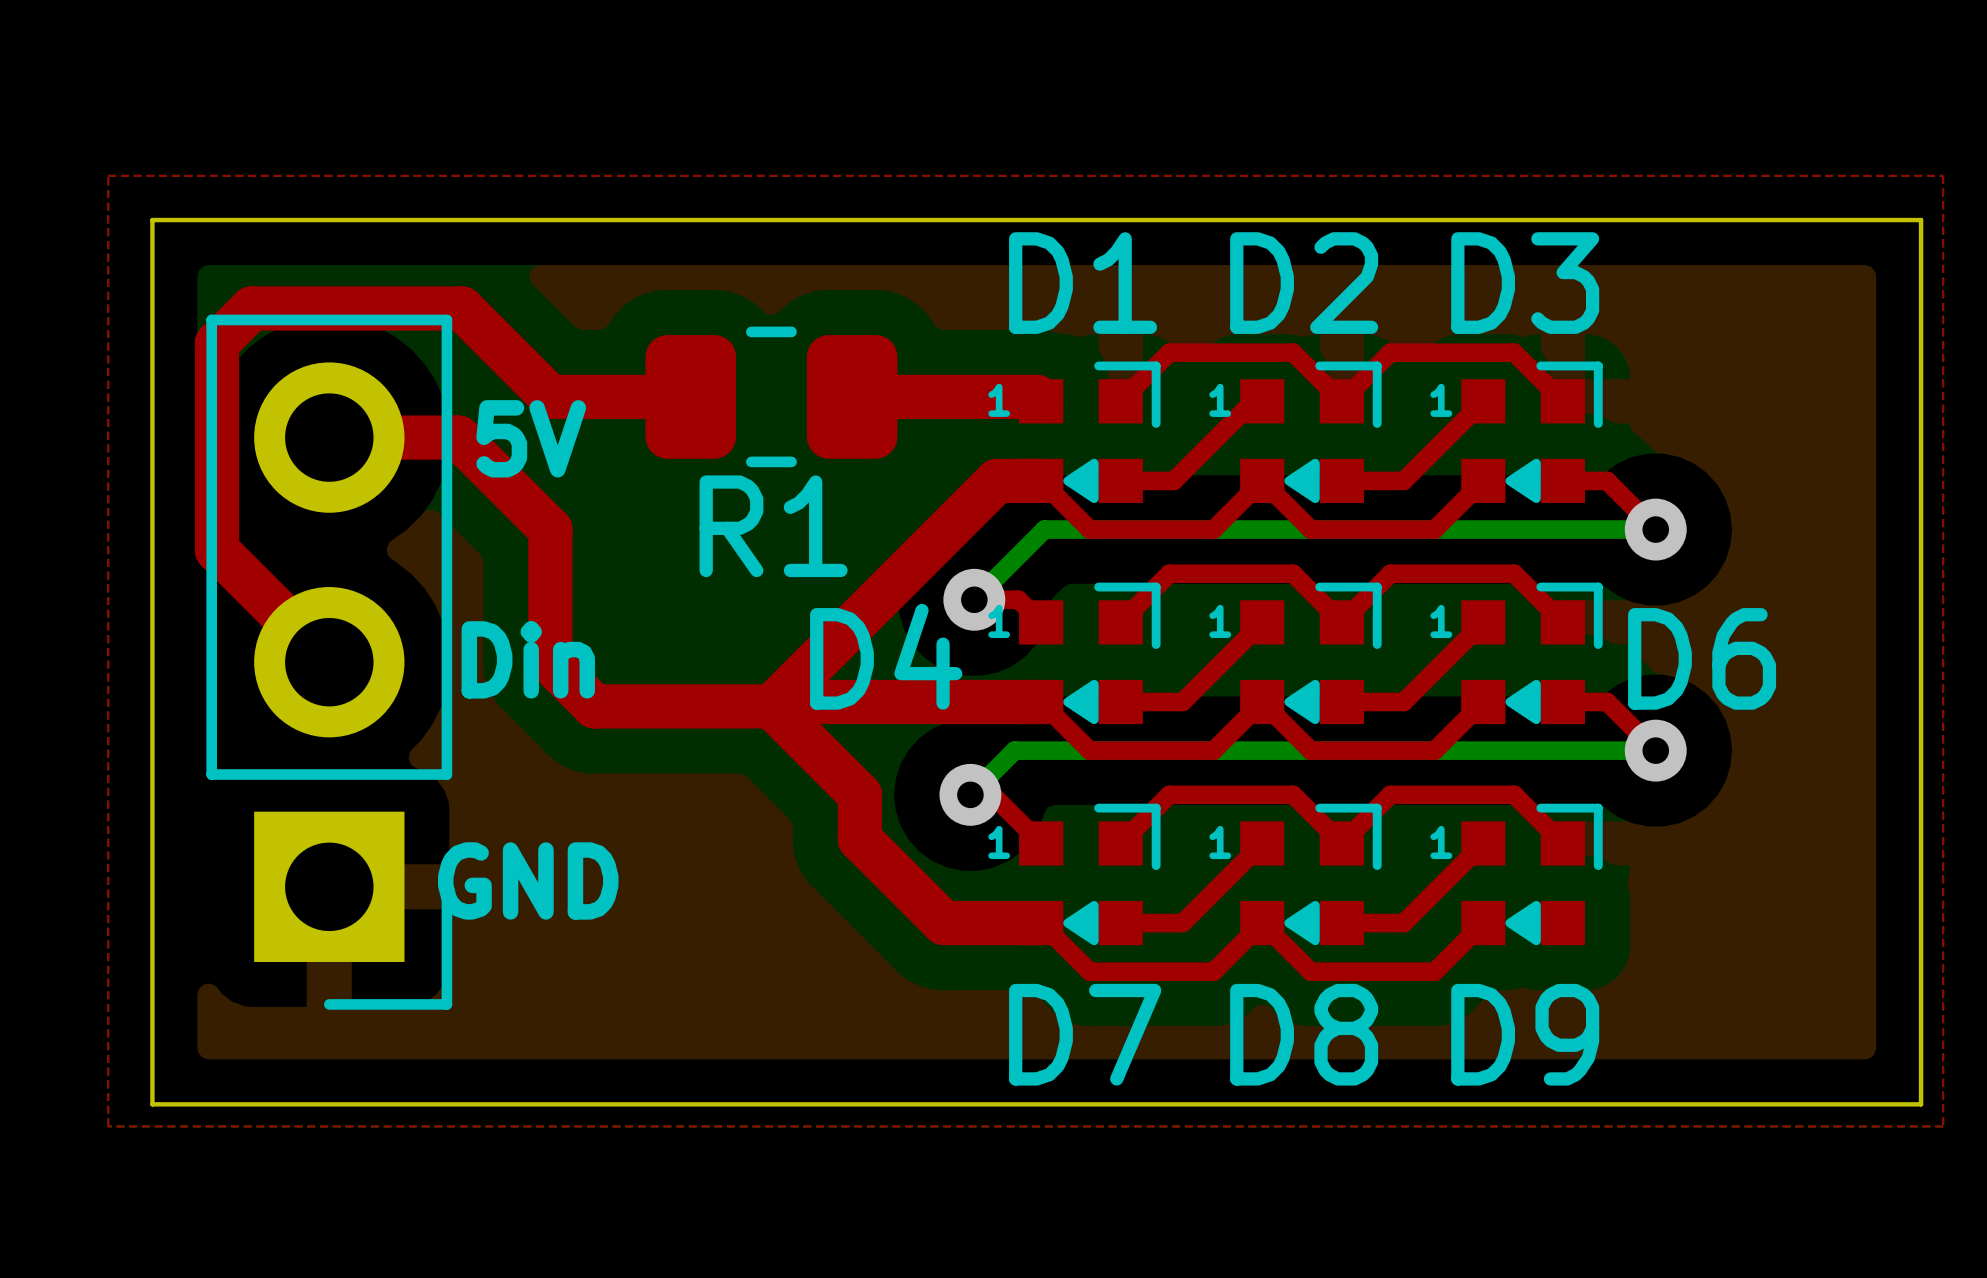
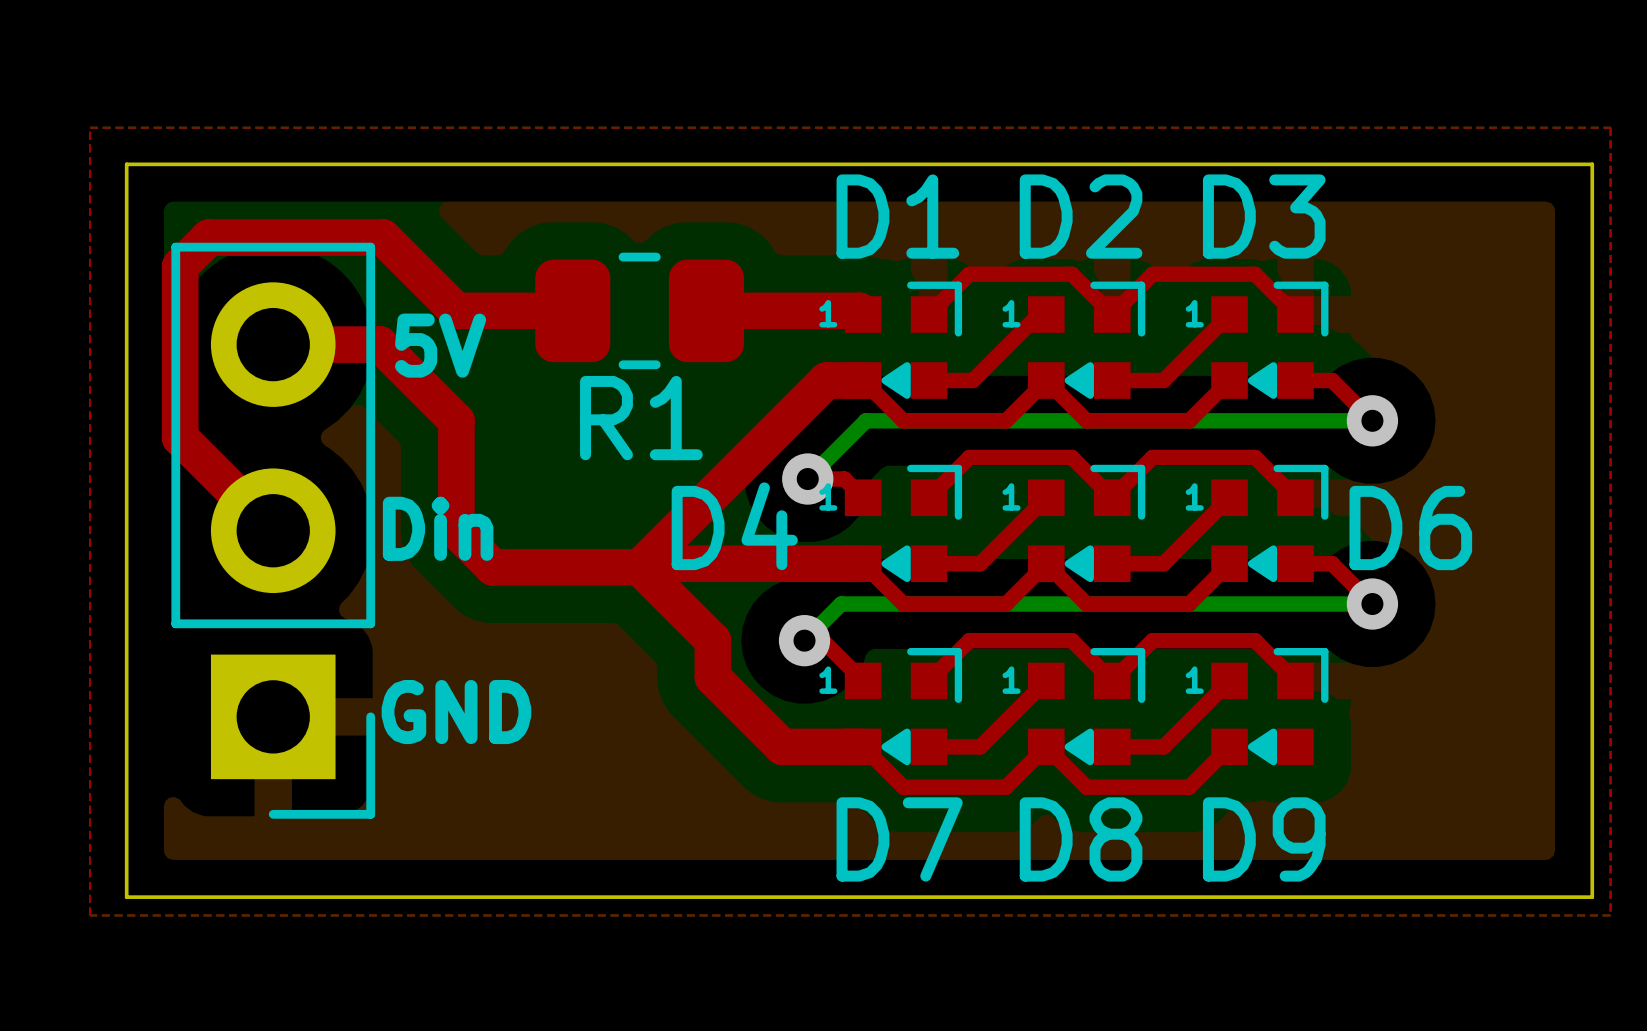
text position: GND (528, 880) -> GND (456, 712)

